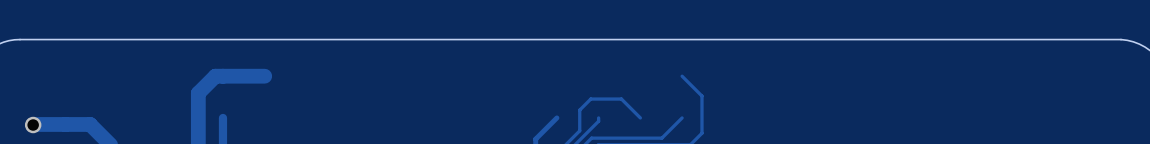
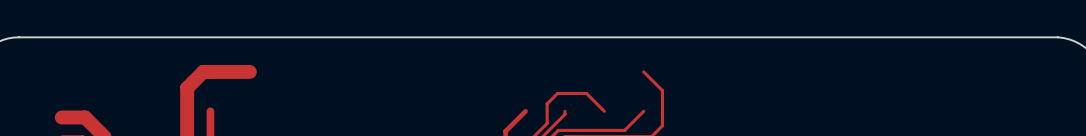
track: (65, 124) (33, 125) -> none
via: (33, 125) -> none

